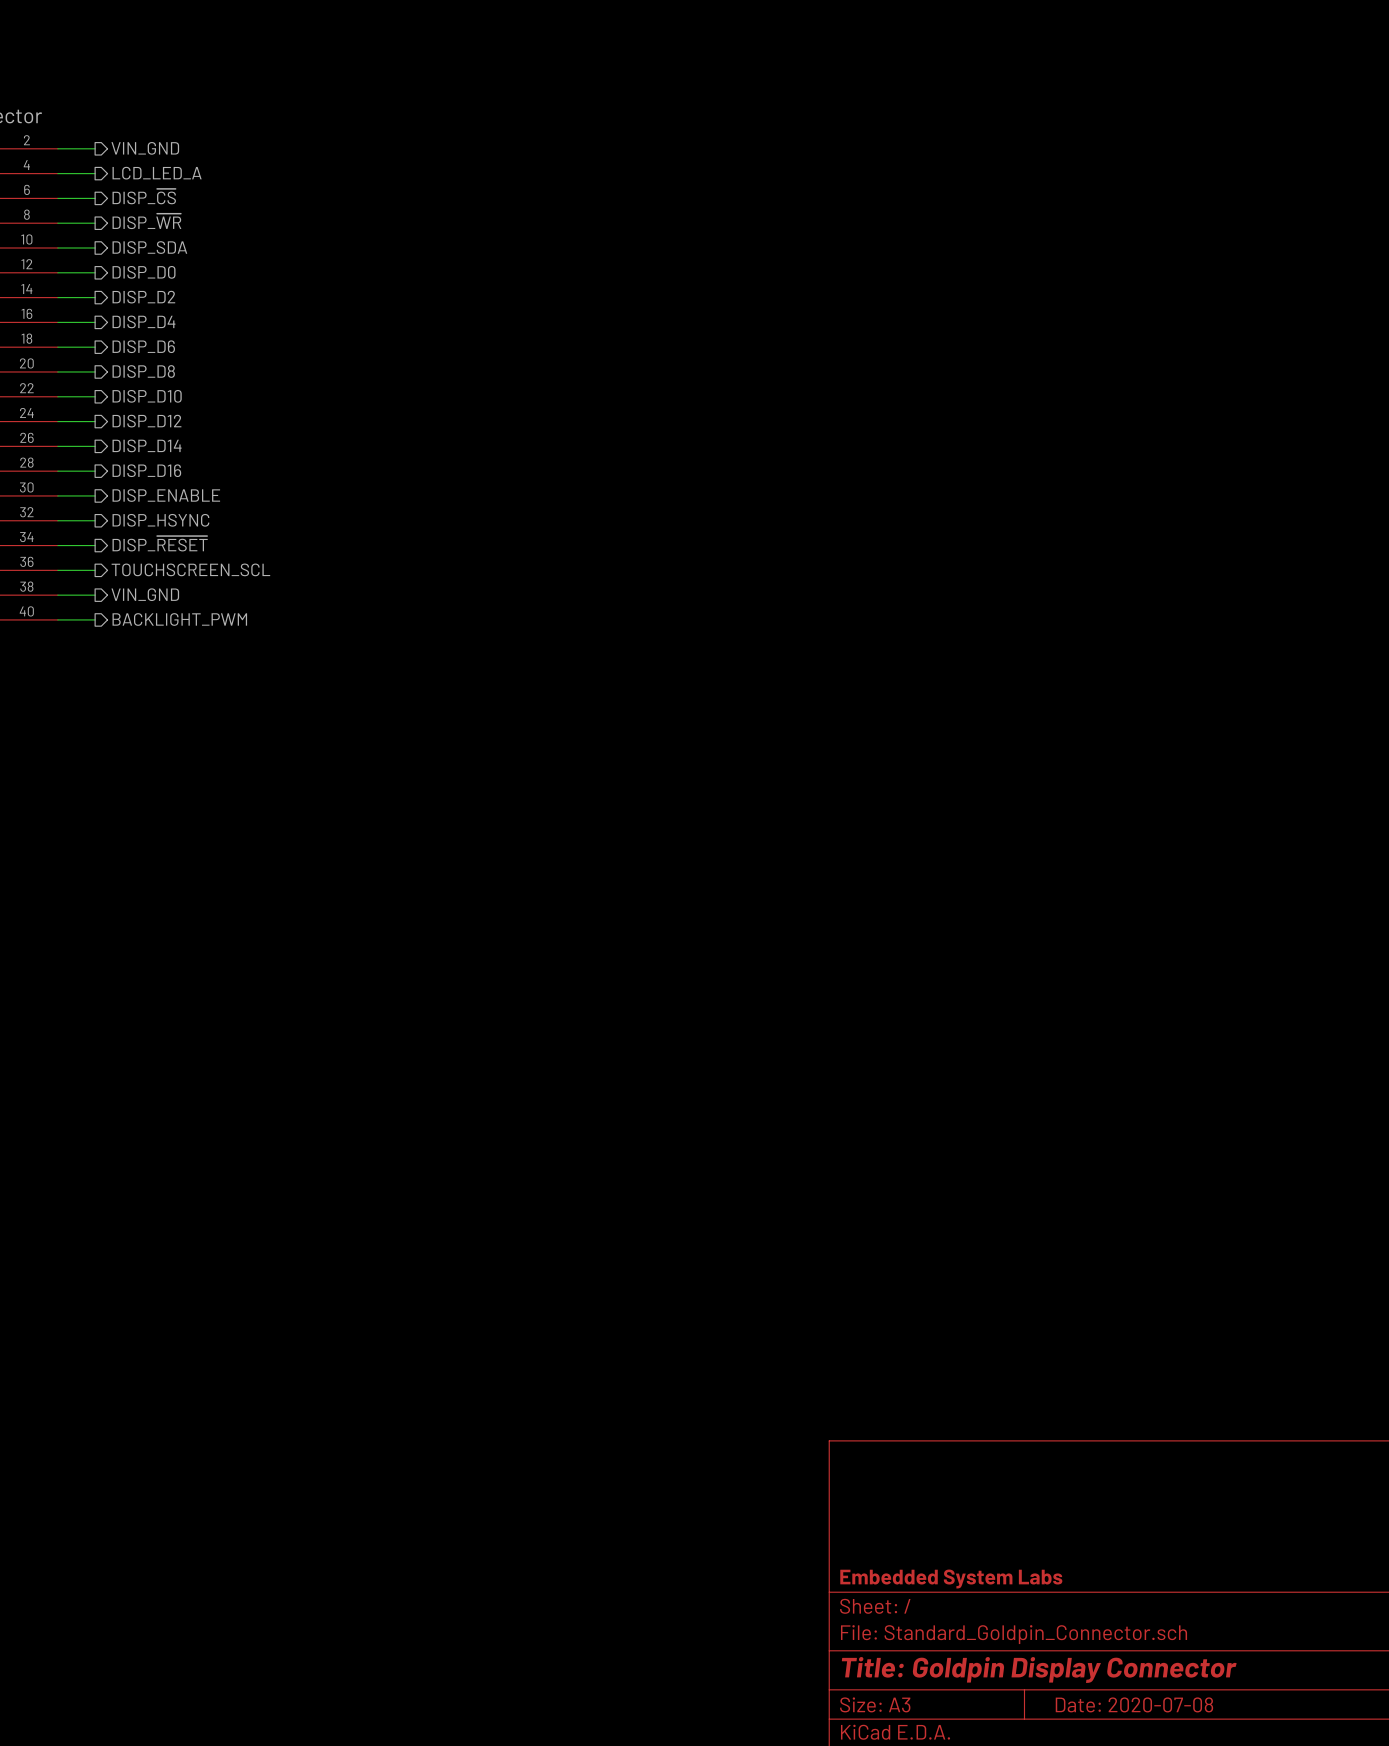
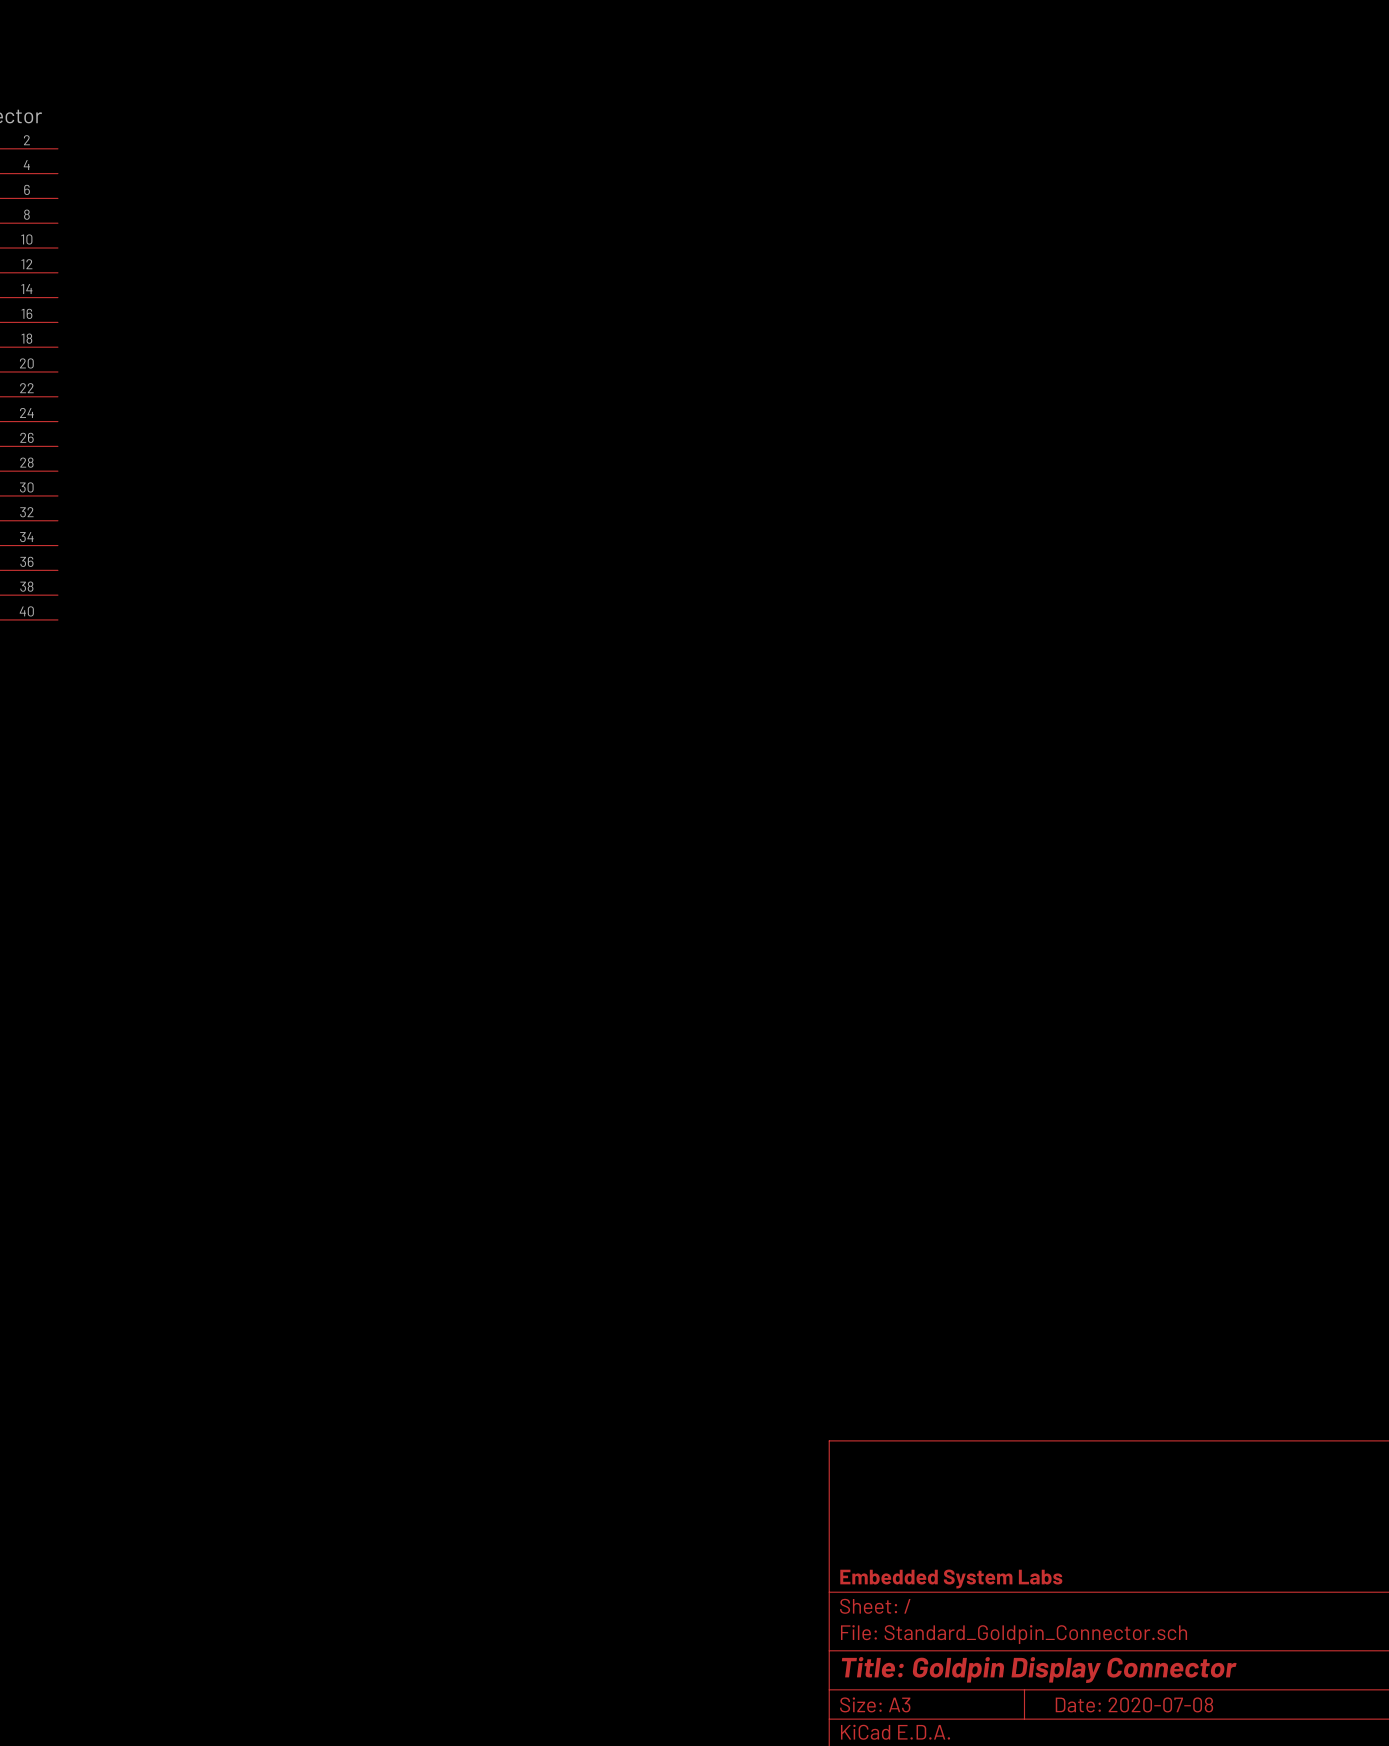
wire: (57, 148) (95, 148) -> none
hierarchical label: VIN_GND (145, 148) -> none
wire: (57, 173) (95, 173) -> none
hierarchical label: LCD_LED_A (157, 173) -> none
hierarchical label: DISP_~{CS} (144, 196) -> none
wire: (57, 198) (95, 198) -> none
hierarchical label: DISP_~{WR} (146, 221) -> none
wire: (57, 223) (95, 223) -> none
hierarchical label: DISP_SDA (149, 247) -> none
wire: (57, 248) (95, 248) -> none
wire: (57, 272) (95, 272) -> none
hierarchical label: DISP_D0 (144, 272) -> none
wire: (57, 297) (95, 297) -> none
hierarchical label: DISP_D2 (143, 297) -> none
hierarchical label: DISP_D4 (143, 321) -> none
wire: (57, 322) (95, 322) -> none
hierarchical label: DISP_D6 (143, 346) -> none
wire: (57, 347) (95, 347) -> none
wire: (57, 371) (95, 371) -> none
hierarchical label: DISP_D8 (143, 371) -> none
wire: (57, 396) (95, 396) -> none
hierarchical label: DISP_D10 (147, 396) -> none
wire: (57, 421) (95, 421) -> none
hierarchical label: DISP_D12 (146, 421) -> none
hierarchical label: DISP_D14 (147, 445) -> none
wire: (57, 446) (95, 446) -> none
hierarchical label: DISP_D16 (146, 470) -> none
wire: (57, 471) (95, 471) -> none
wire: (57, 495) (95, 495) -> none
hierarchical label: DISP_ENABLE (166, 495) -> none
wire: (57, 520) (95, 520) -> none
hierarchical label: DISP_HSYNC (160, 520) -> none
hierarchical label: DISP_~{RESET} (160, 543) -> none
wire: (57, 545) (95, 545) -> none
hierarchical label: TOUCHSCREEN_SCL (190, 569) -> none
wire: (57, 570) (95, 570) -> none
hierarchical label: VIN_GND (145, 594) -> none
wire: (57, 595) (95, 595) -> none
wire: (57, 619) (95, 619) -> none
hierarchical label: BACKLIGHT_PWM (179, 619) -> none

